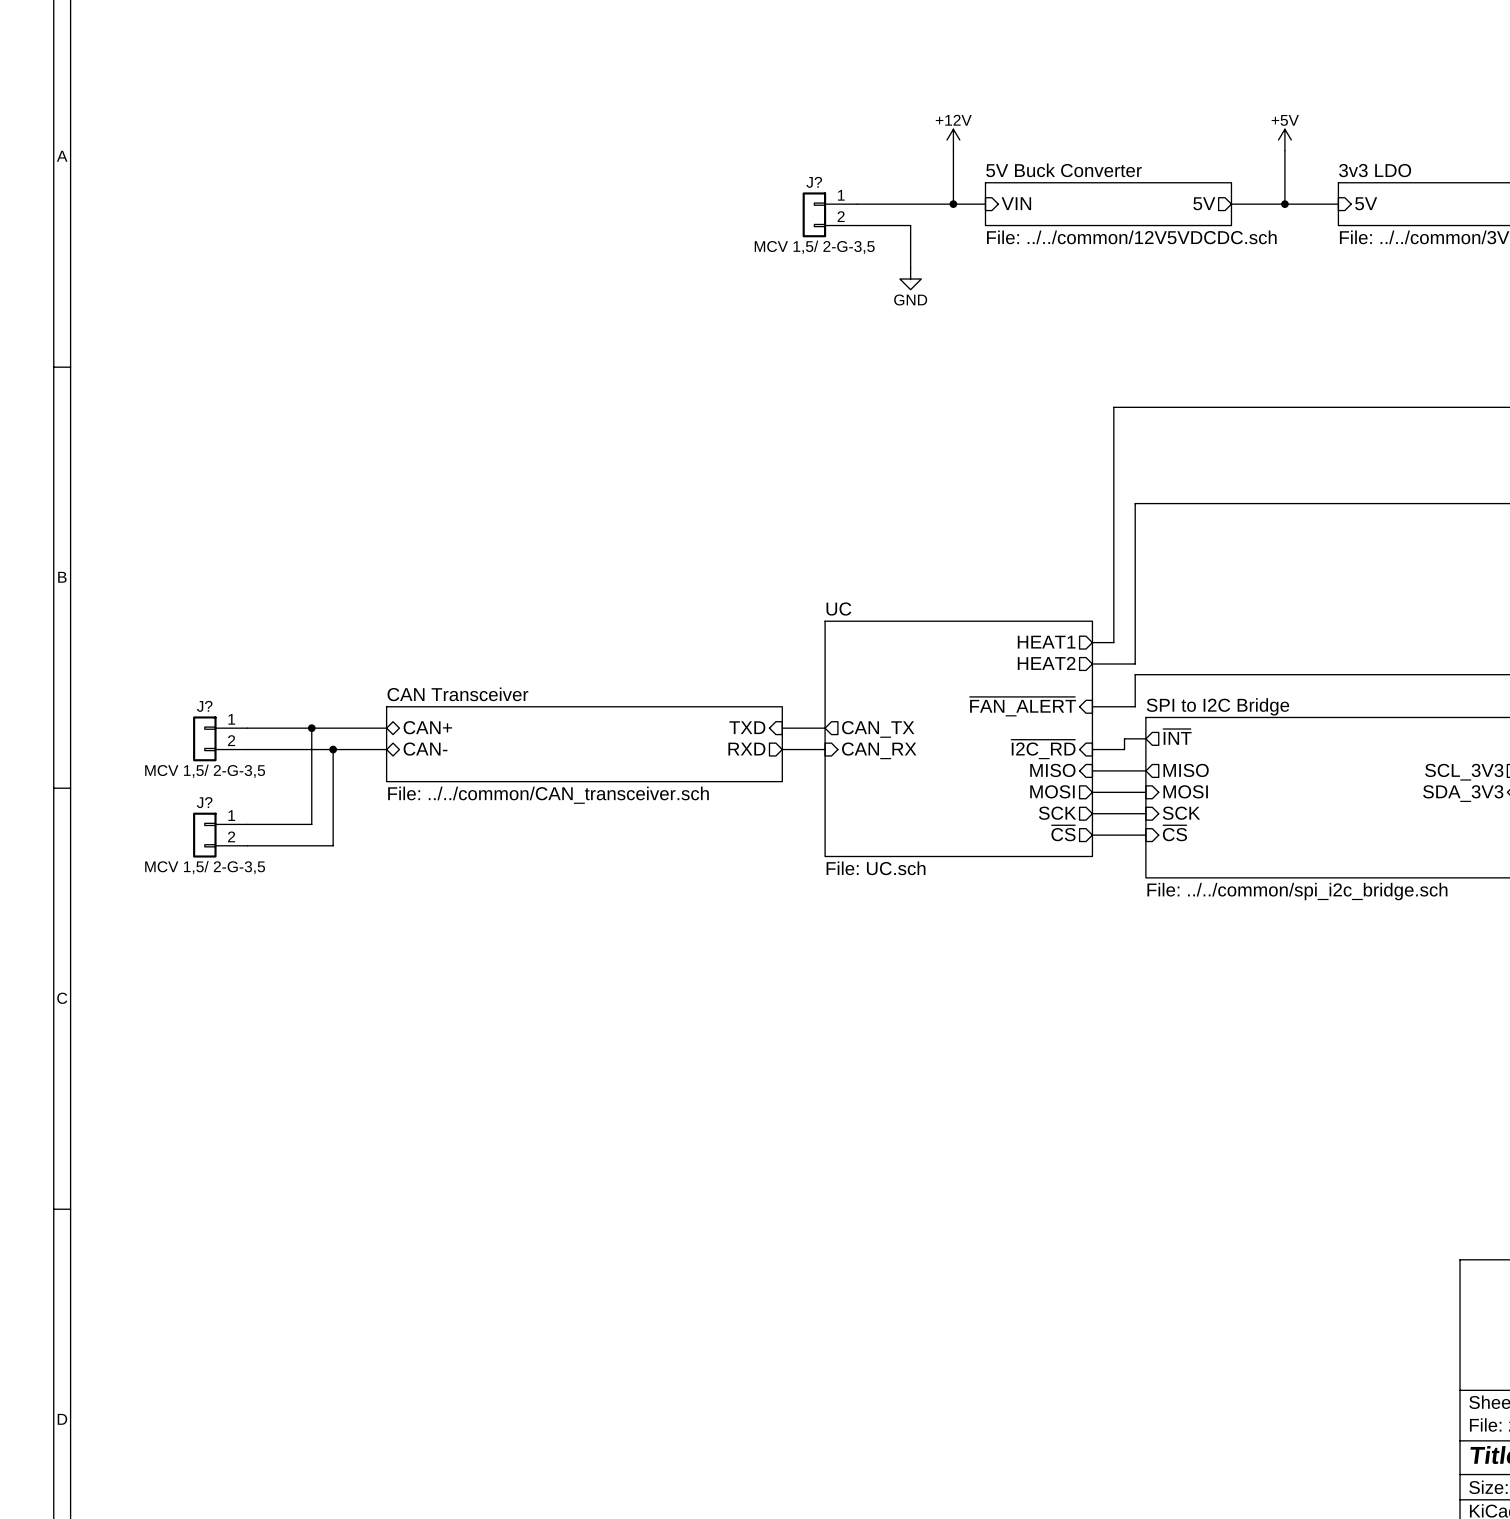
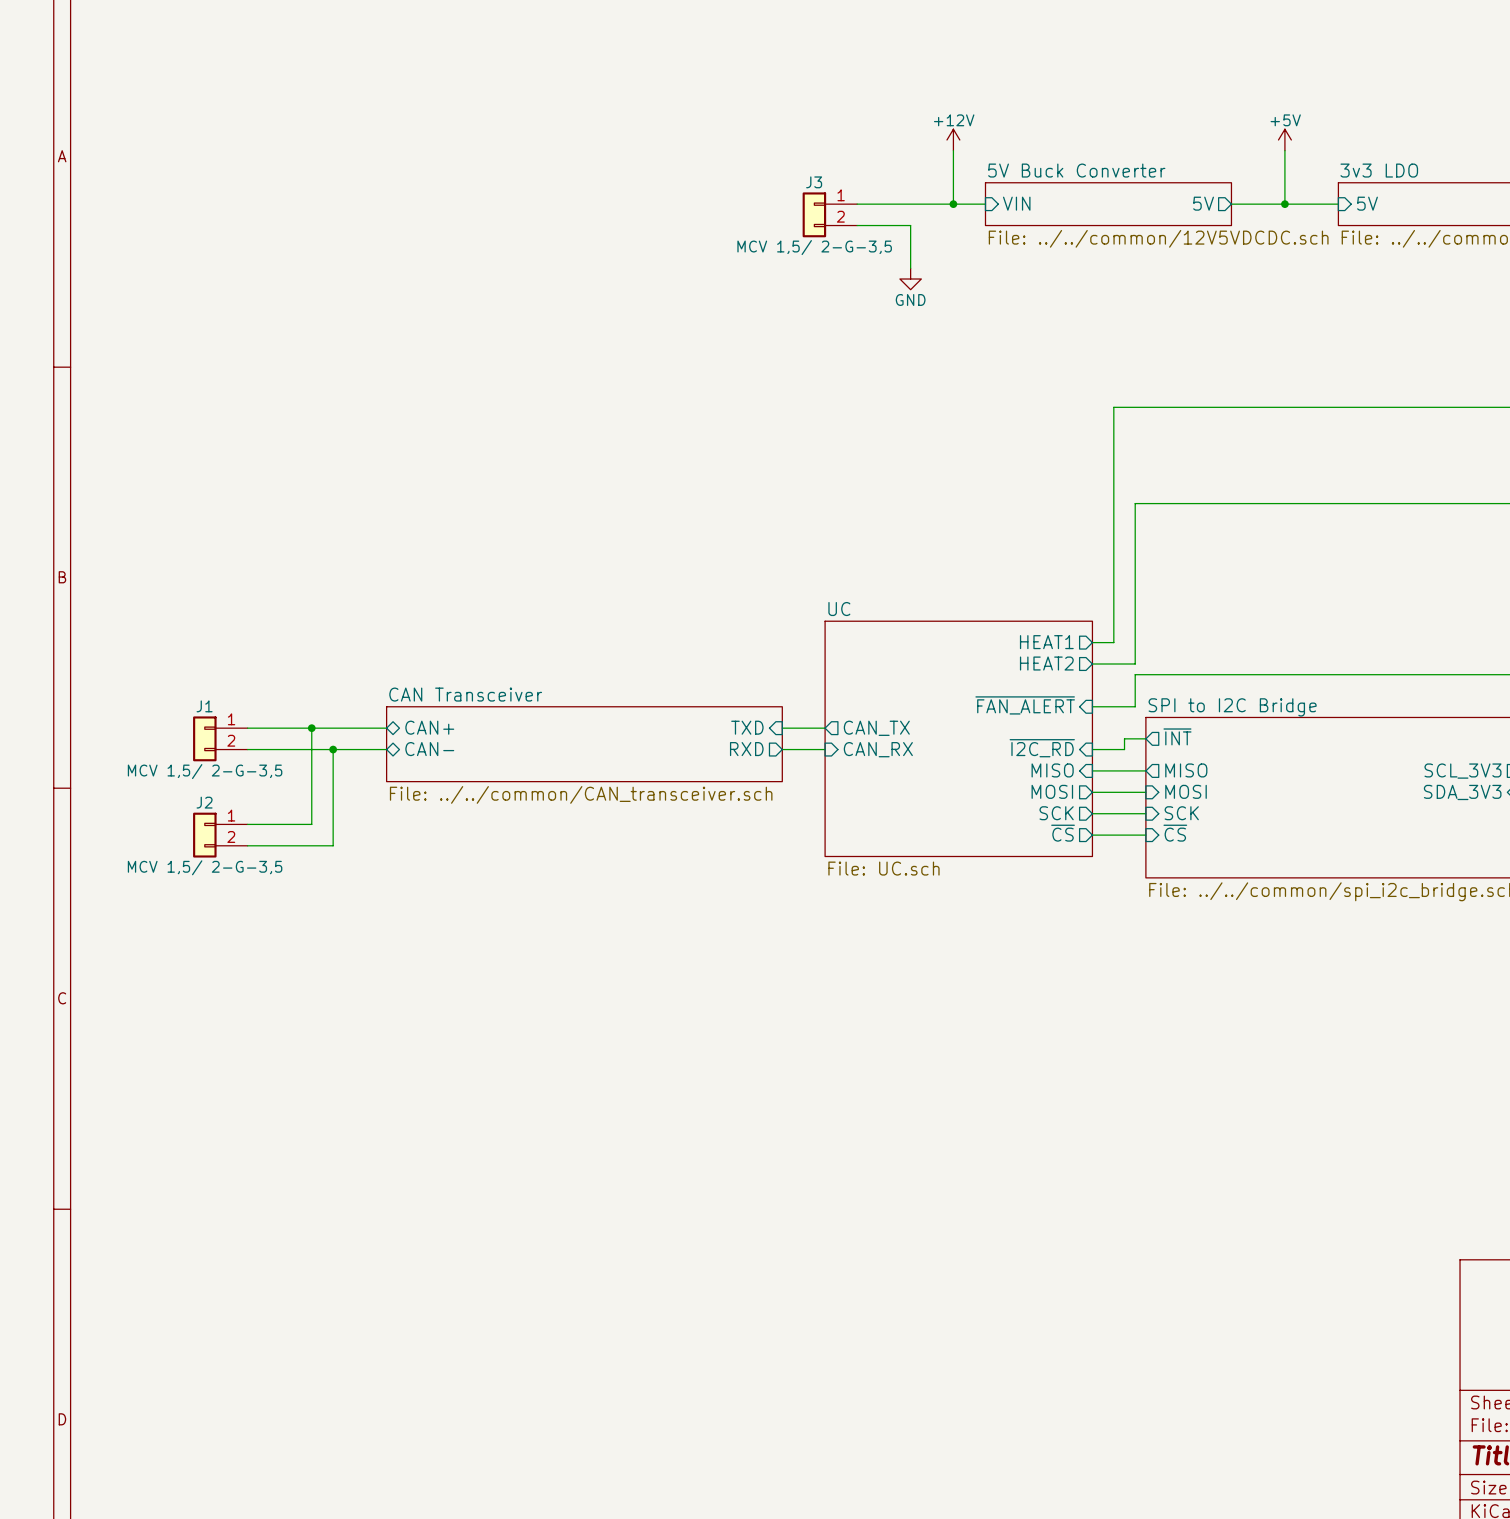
J? name: J? (814, 182) -> J3 (814, 182)
J? name: J? (204, 706) -> J1 (204, 706)
J? name: J? (204, 802) -> J2 (204, 802)

